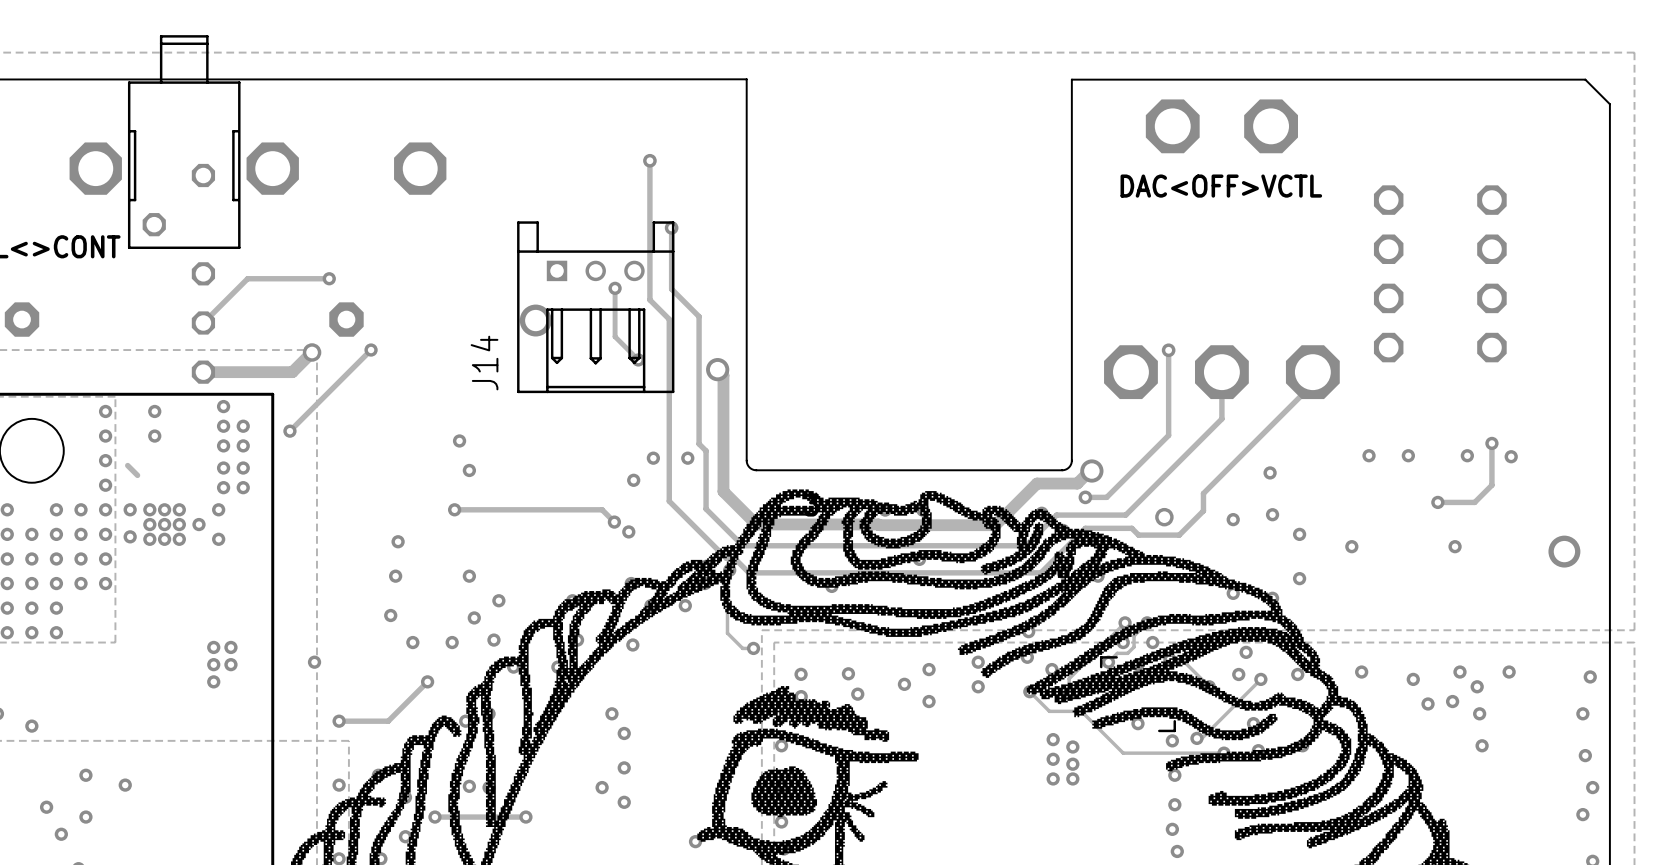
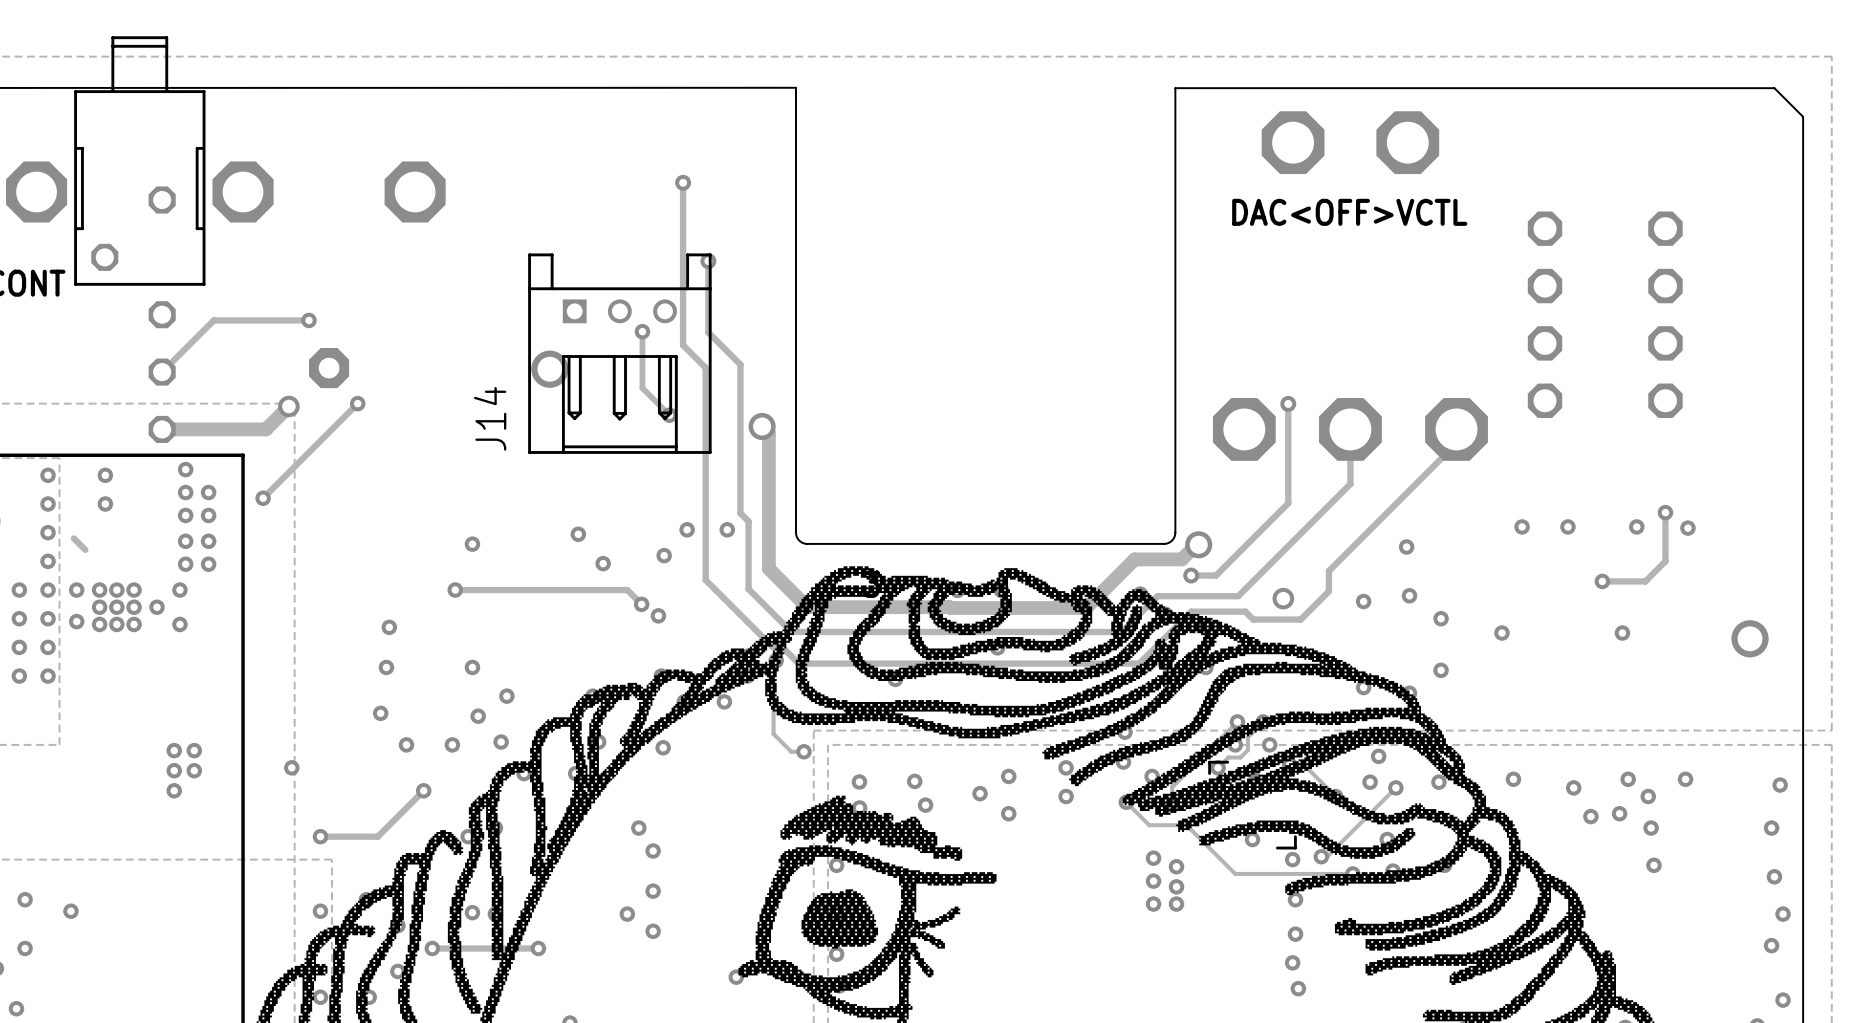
via: (459, 440) -> none
via: none -> (578, 534)
via: none -> (603, 563)

